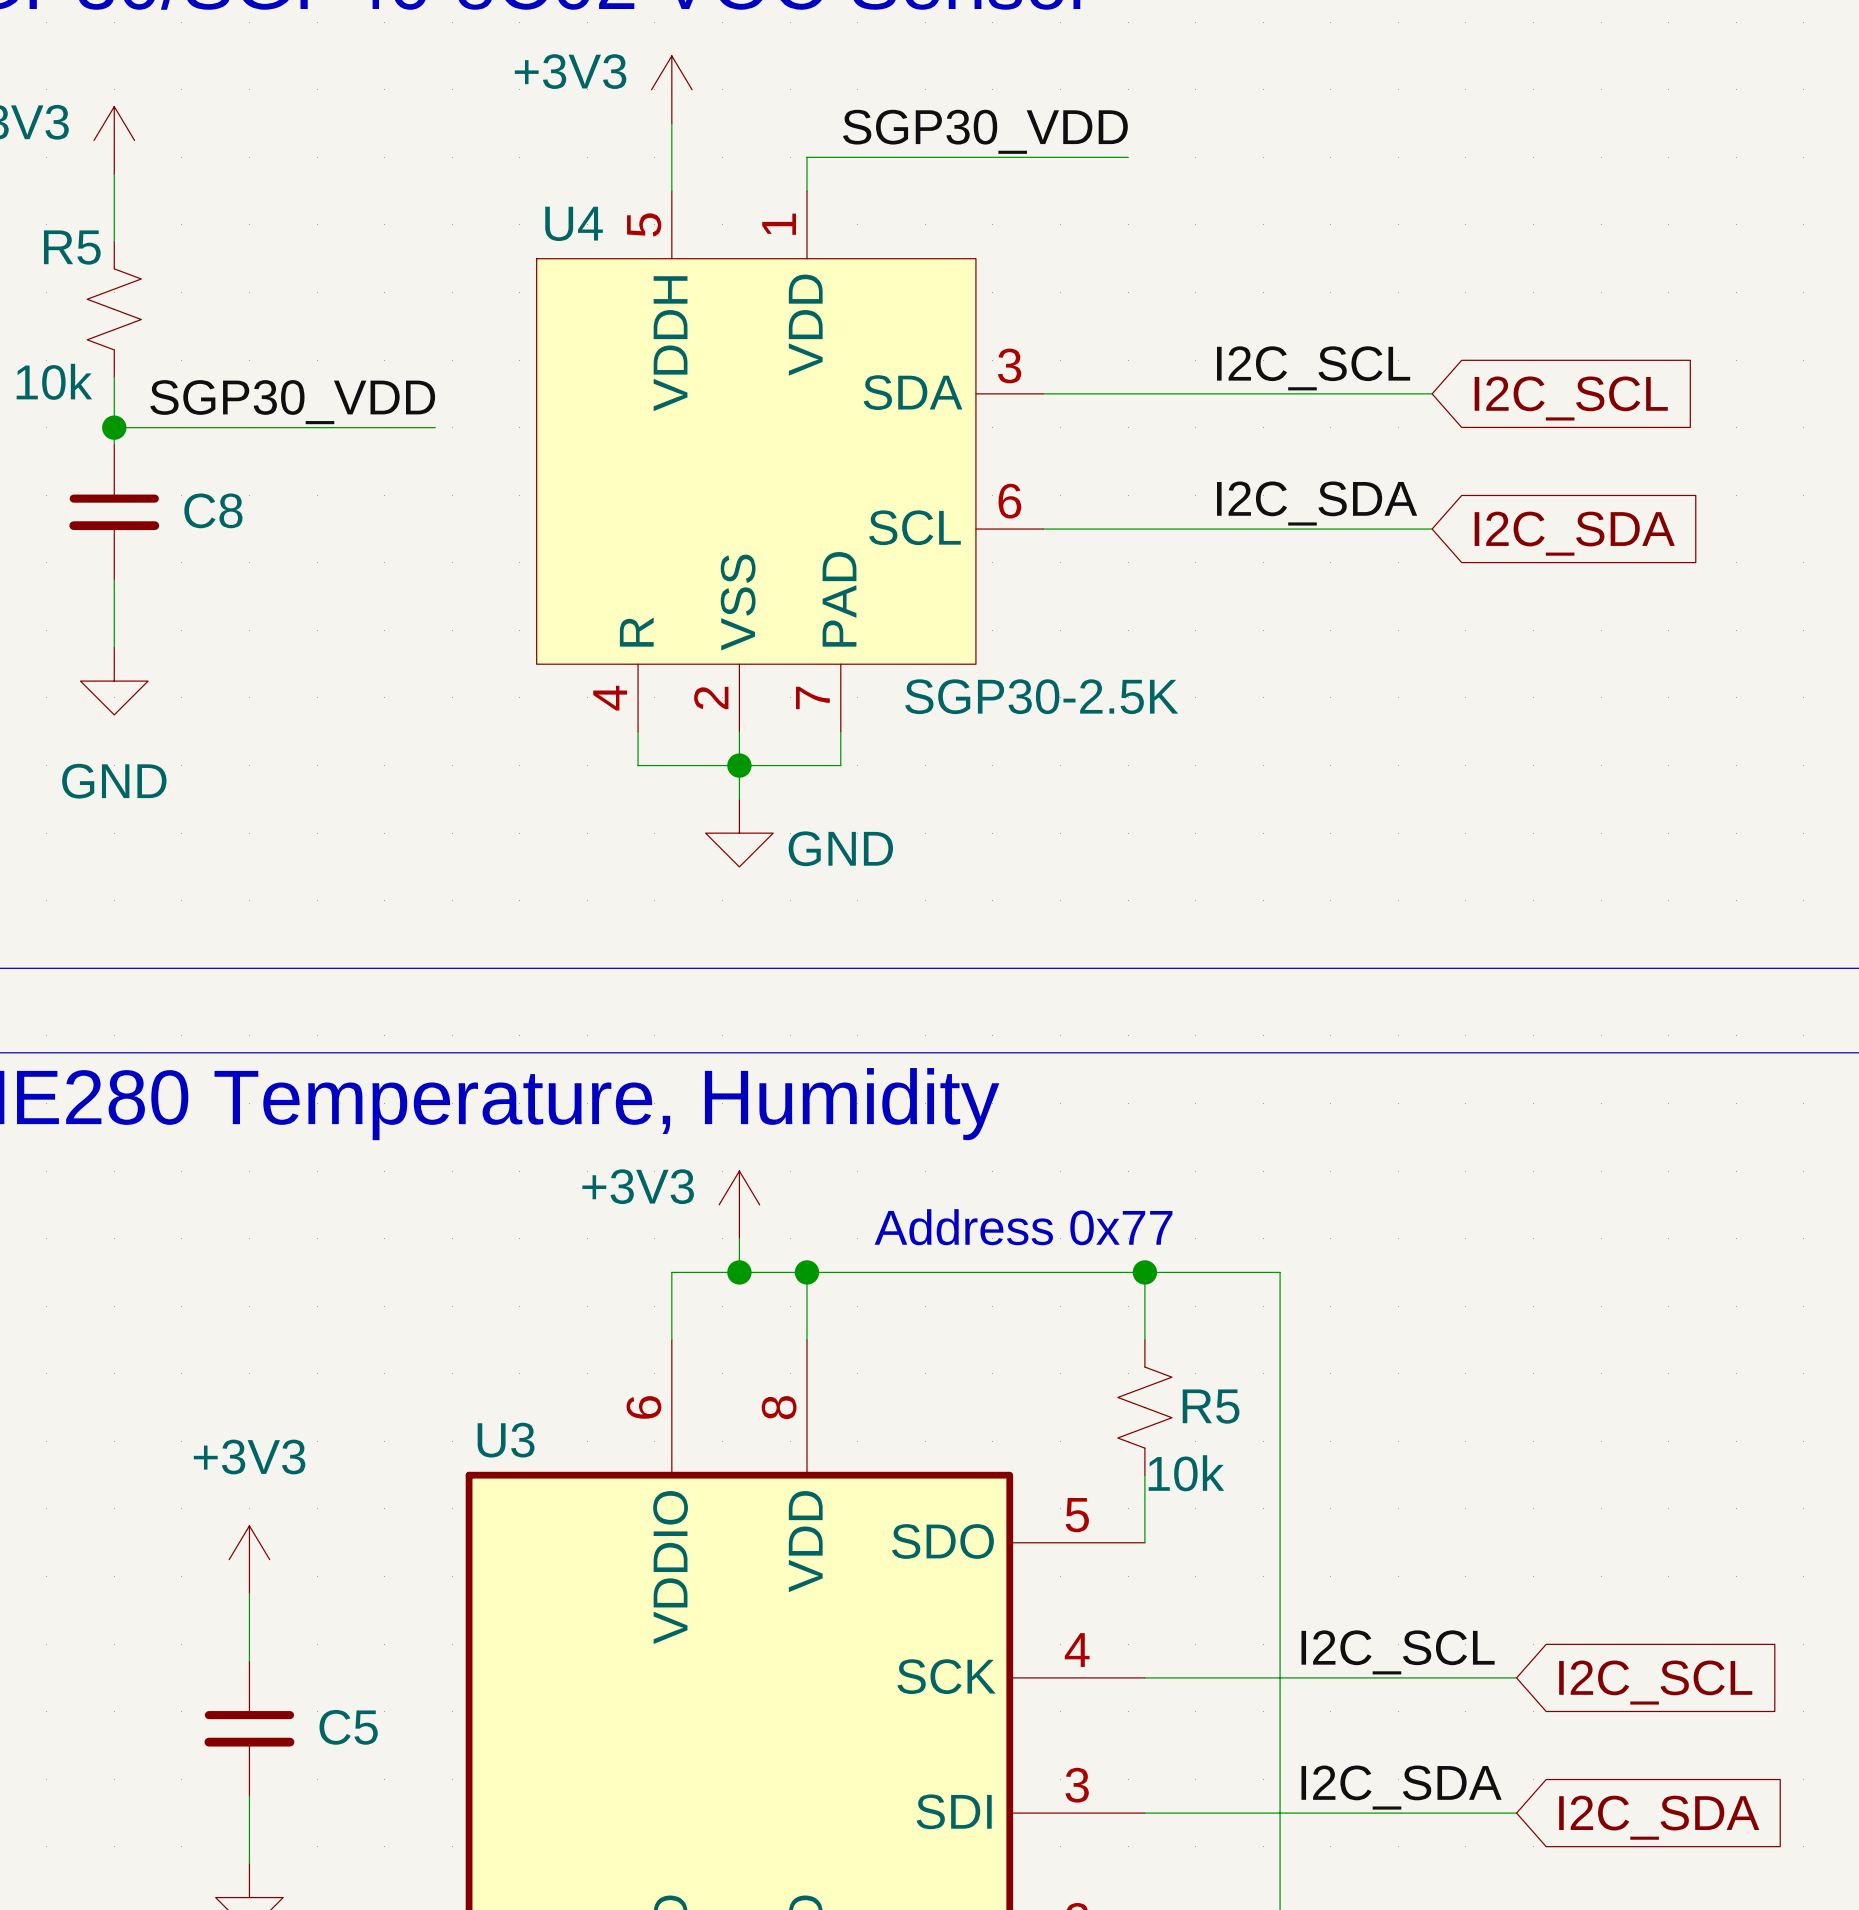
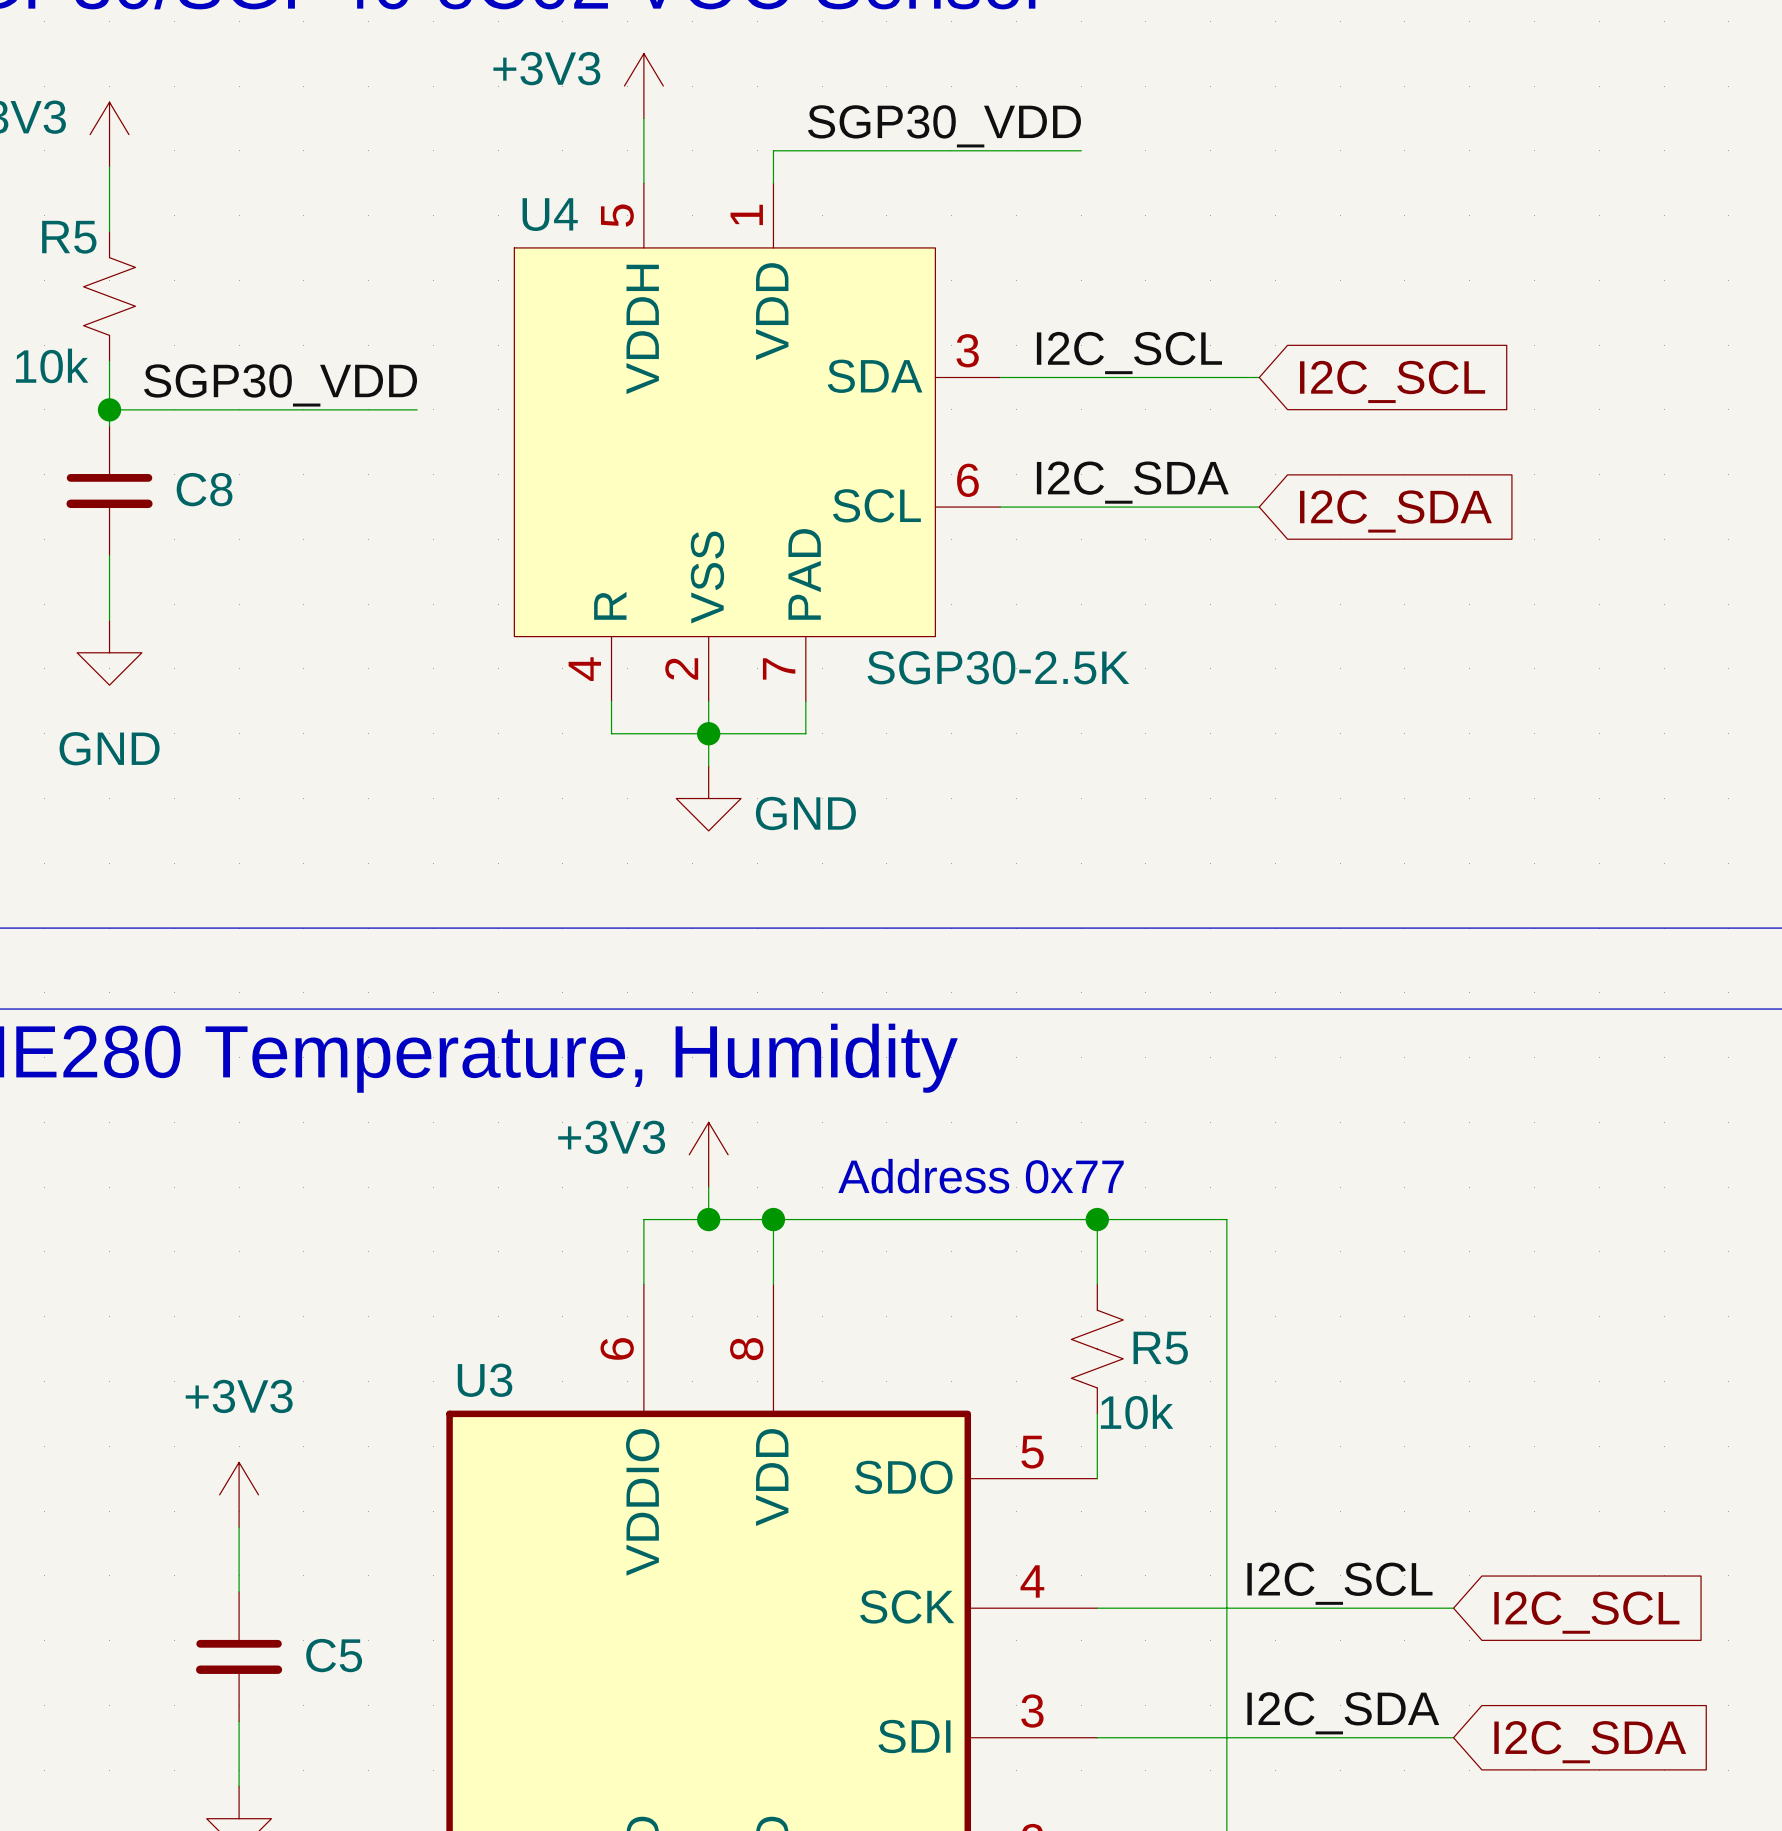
label position: I2C_SCL (1313, 368) -> I2C_SCL (1129, 353)
wire: (1313, 393) (1432, 393) -> none
global label position: I2C_SCL (1571, 398) -> I2C_SCL (1392, 381)
label position: I2C_SDA (1317, 503) -> I2C_SDA (1132, 482)
wire: (1313, 529) (1432, 529) -> none
global label position: I2C_SDA (1574, 533) -> I2C_SDA (1395, 511)

